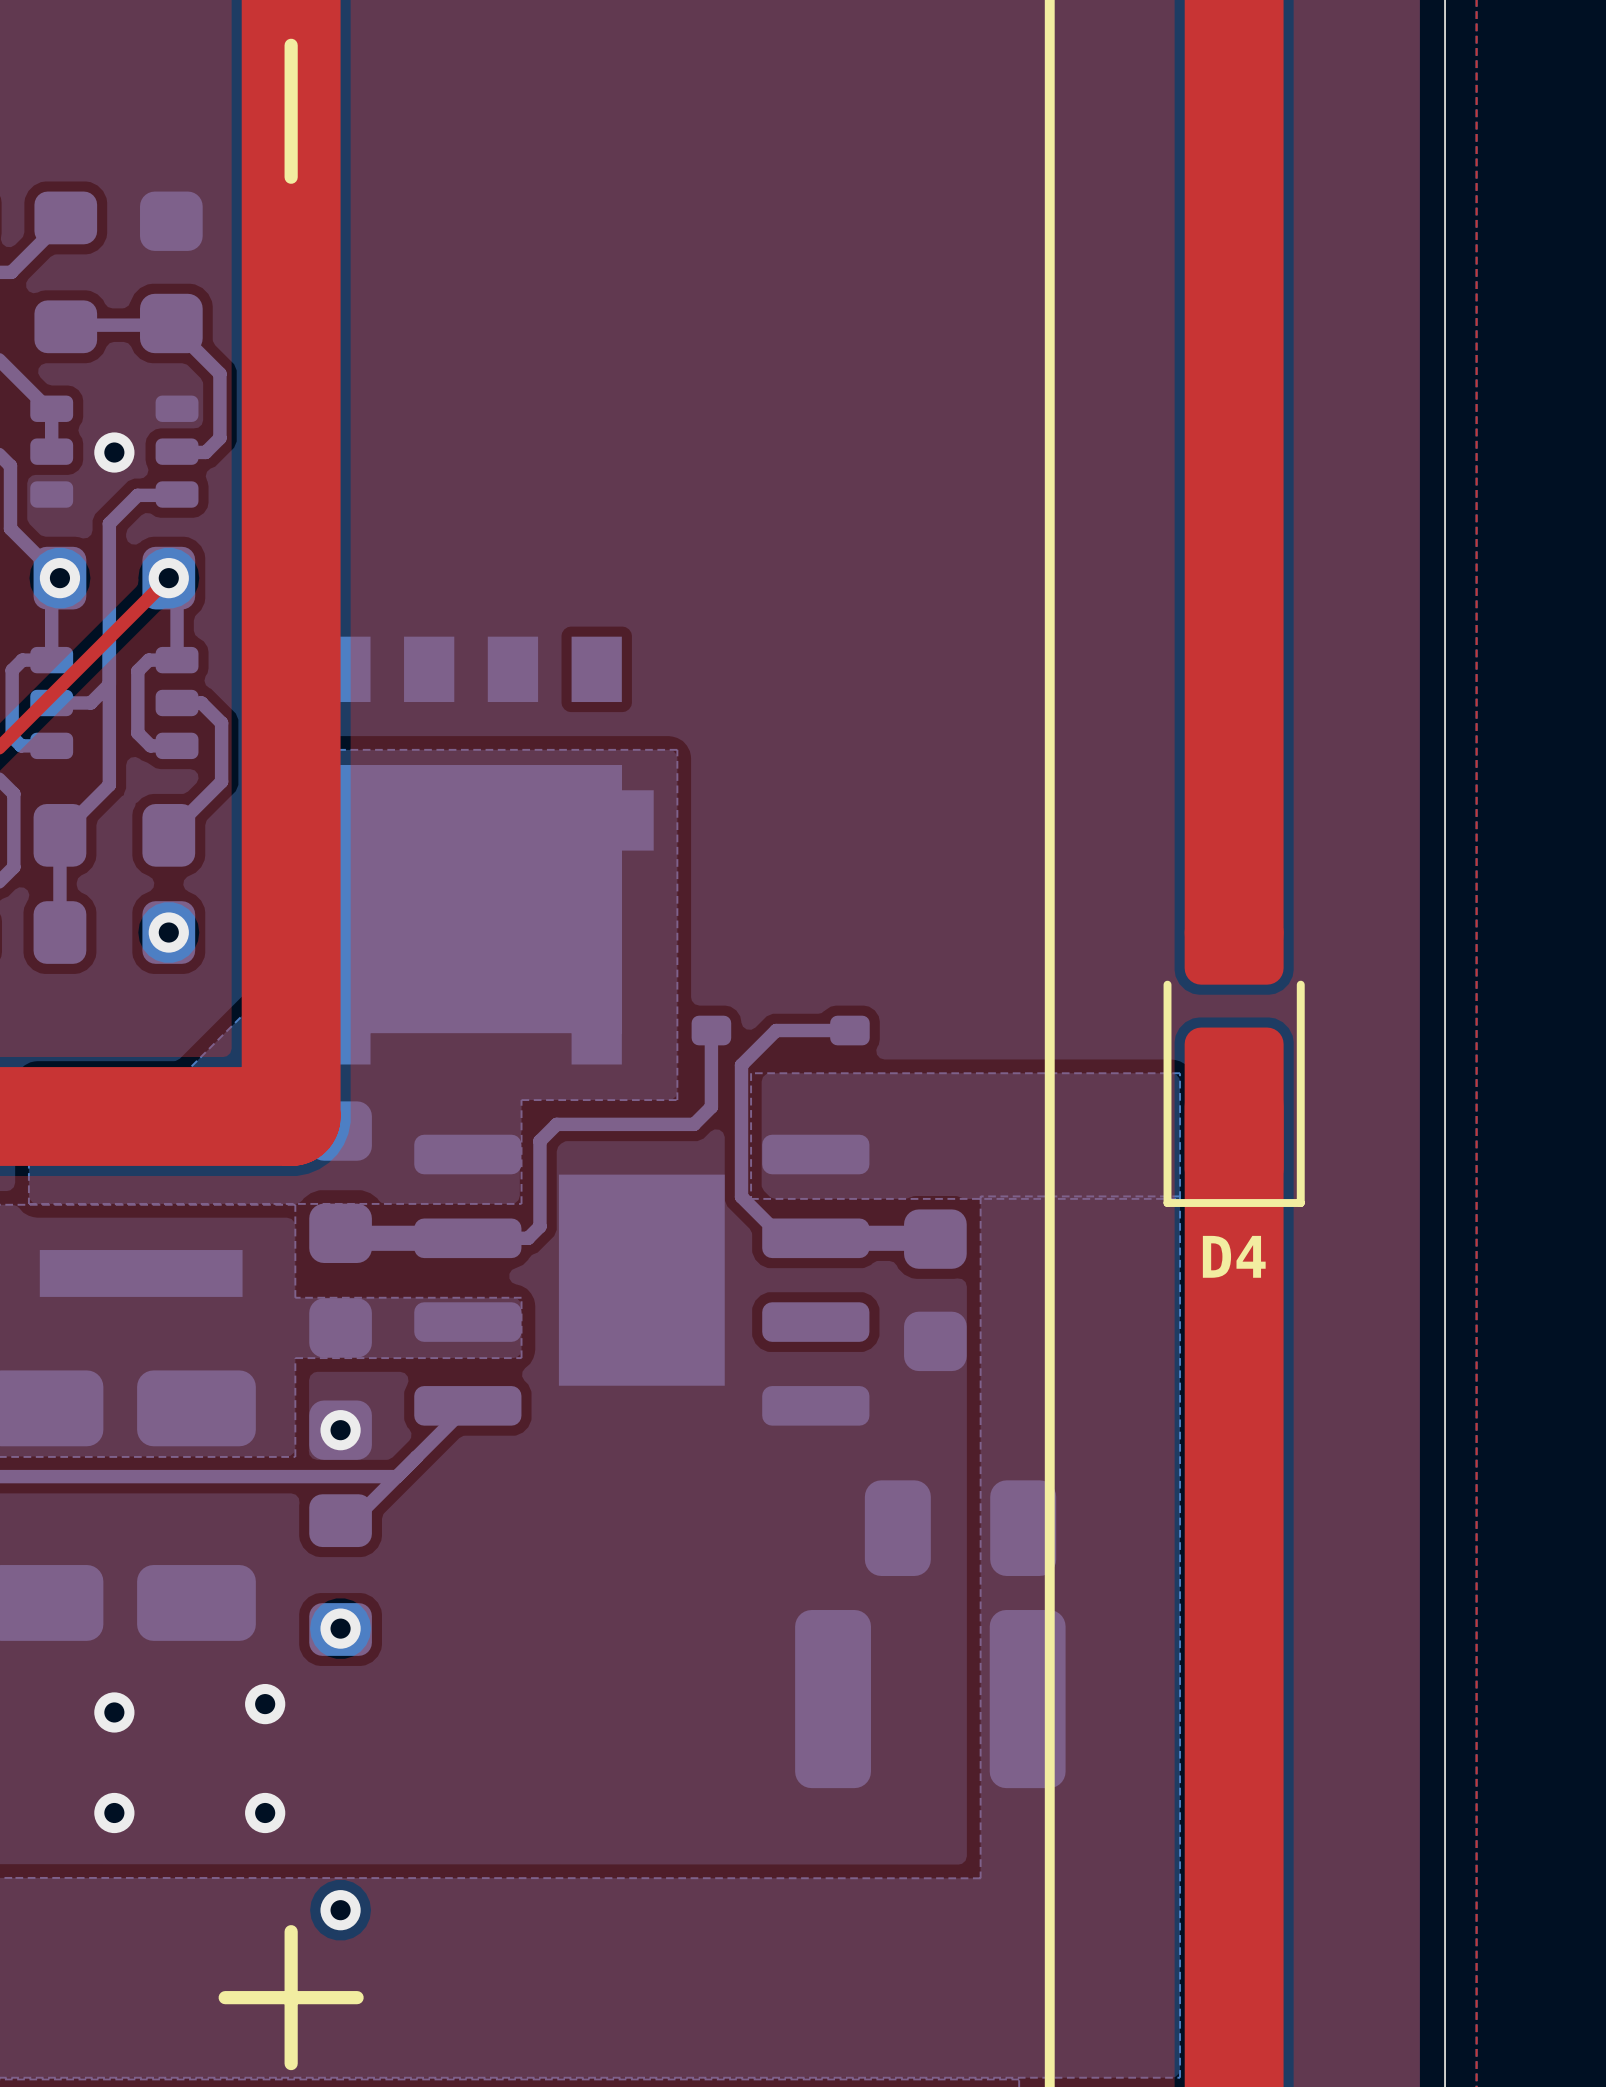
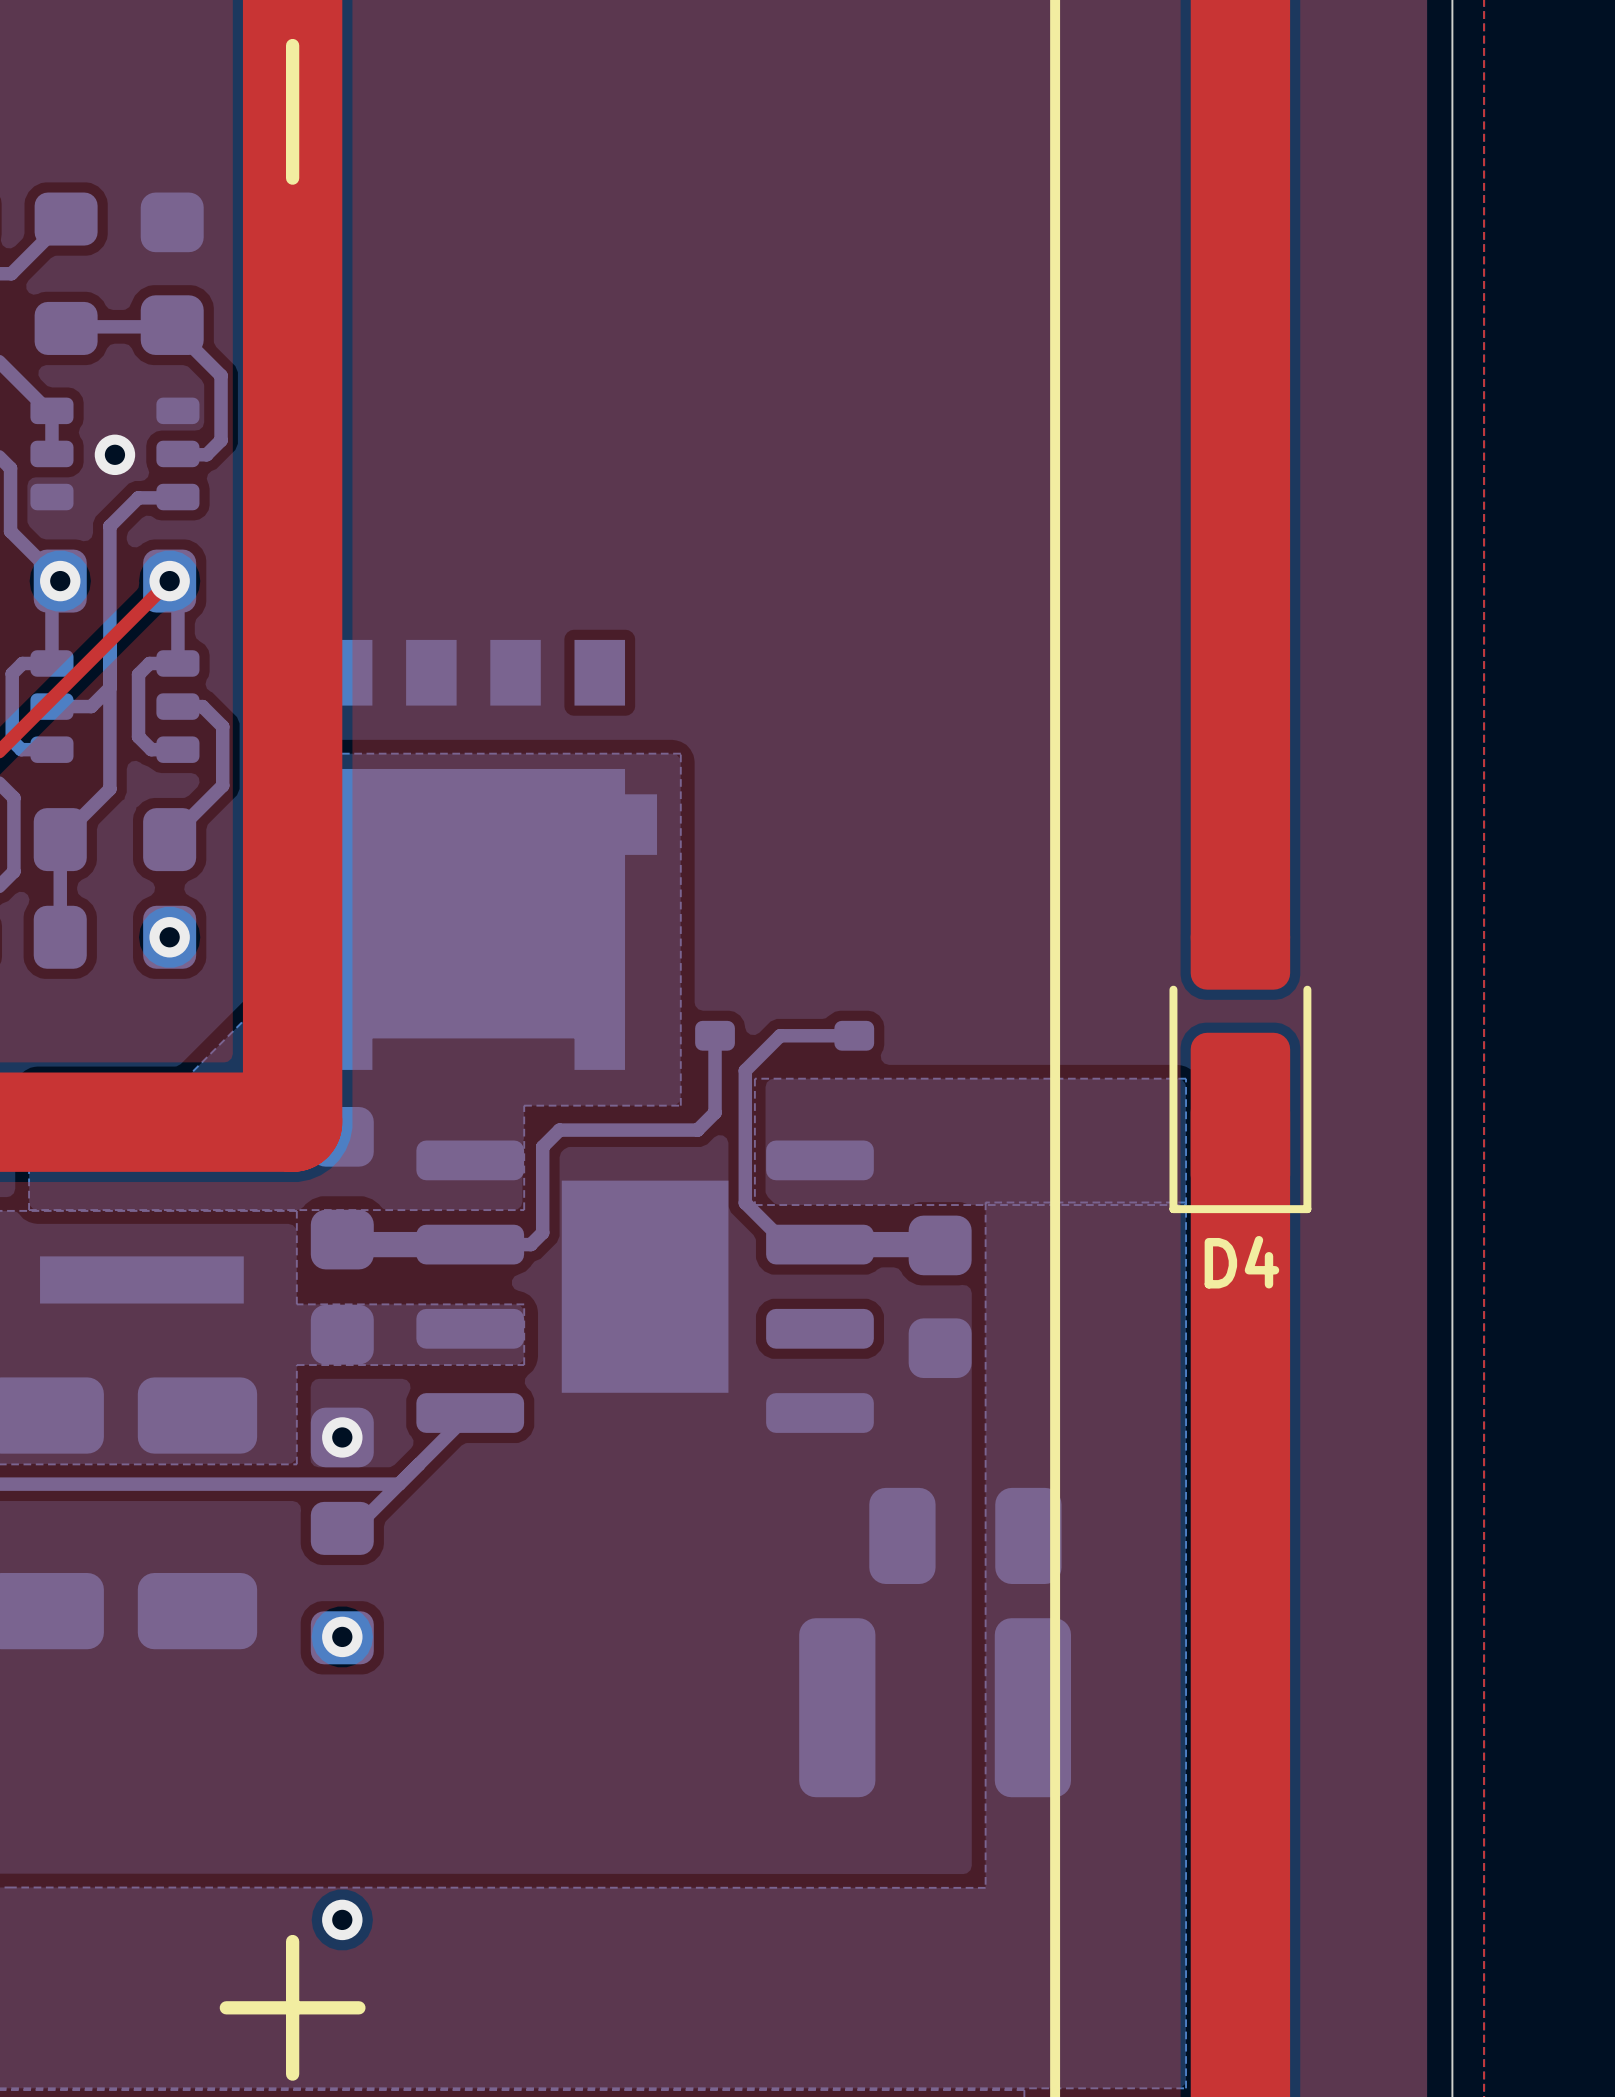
via: (265, 1704) -> none
via: (114, 1712) -> none
via: (114, 1813) -> none
via: (265, 1813) -> none

